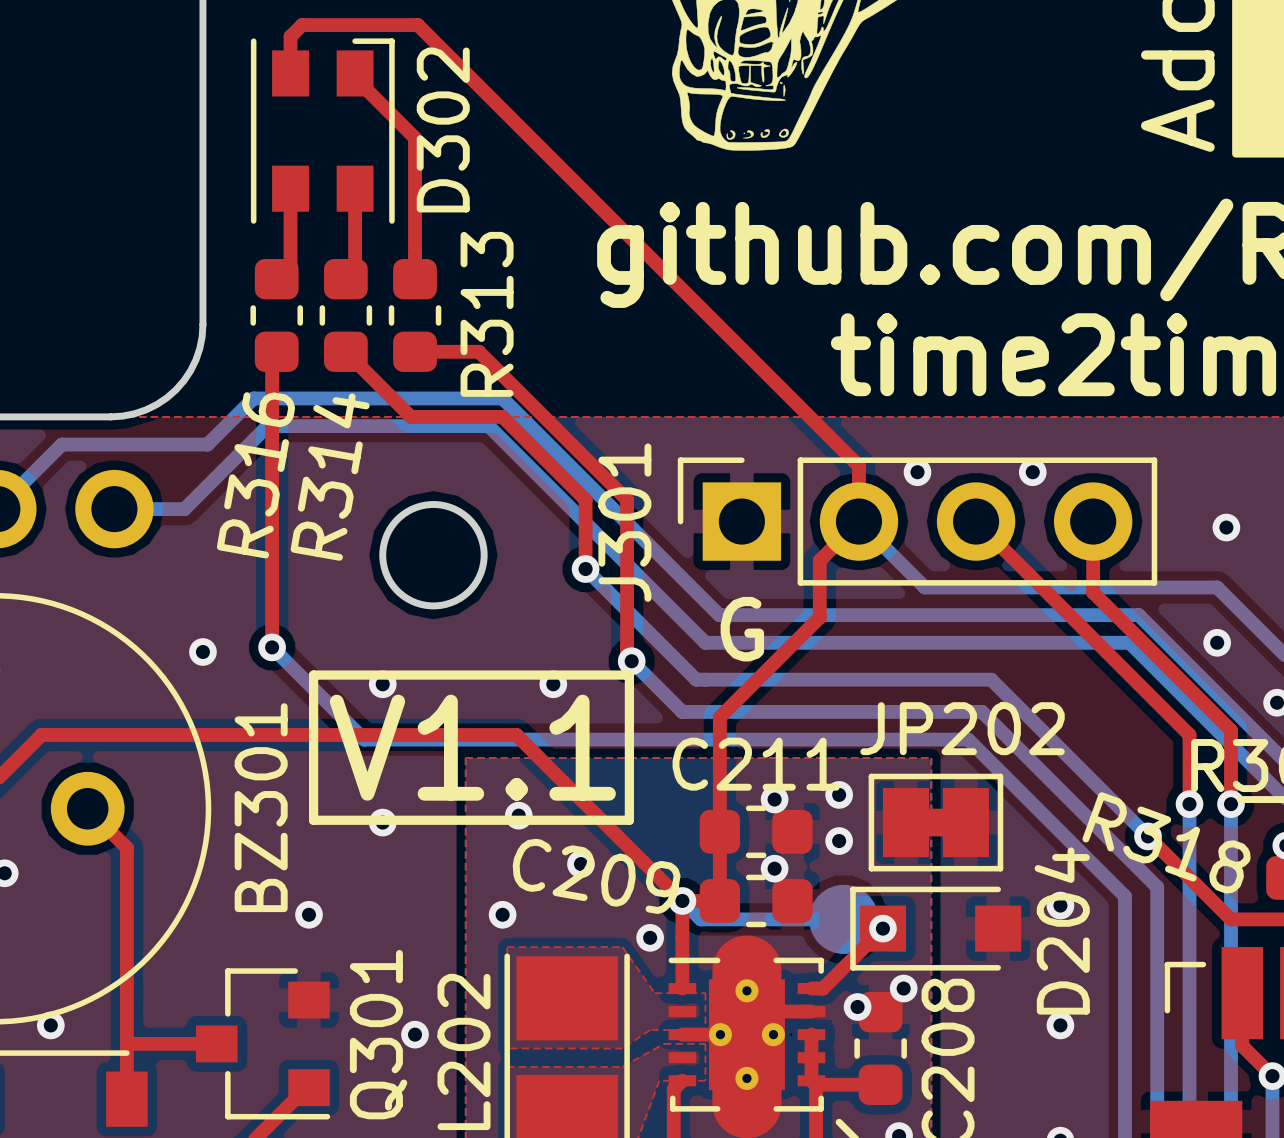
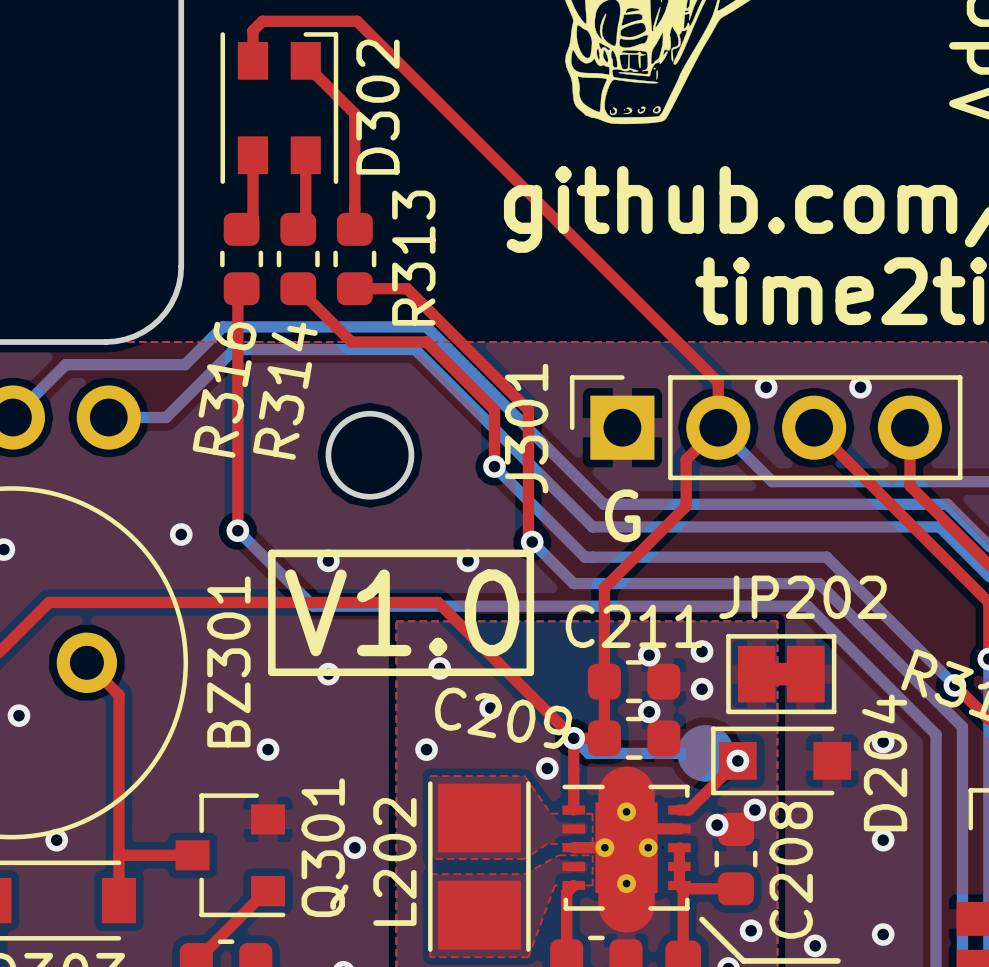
text: V1.1 (472, 747) -> V1.0 (402, 612)

